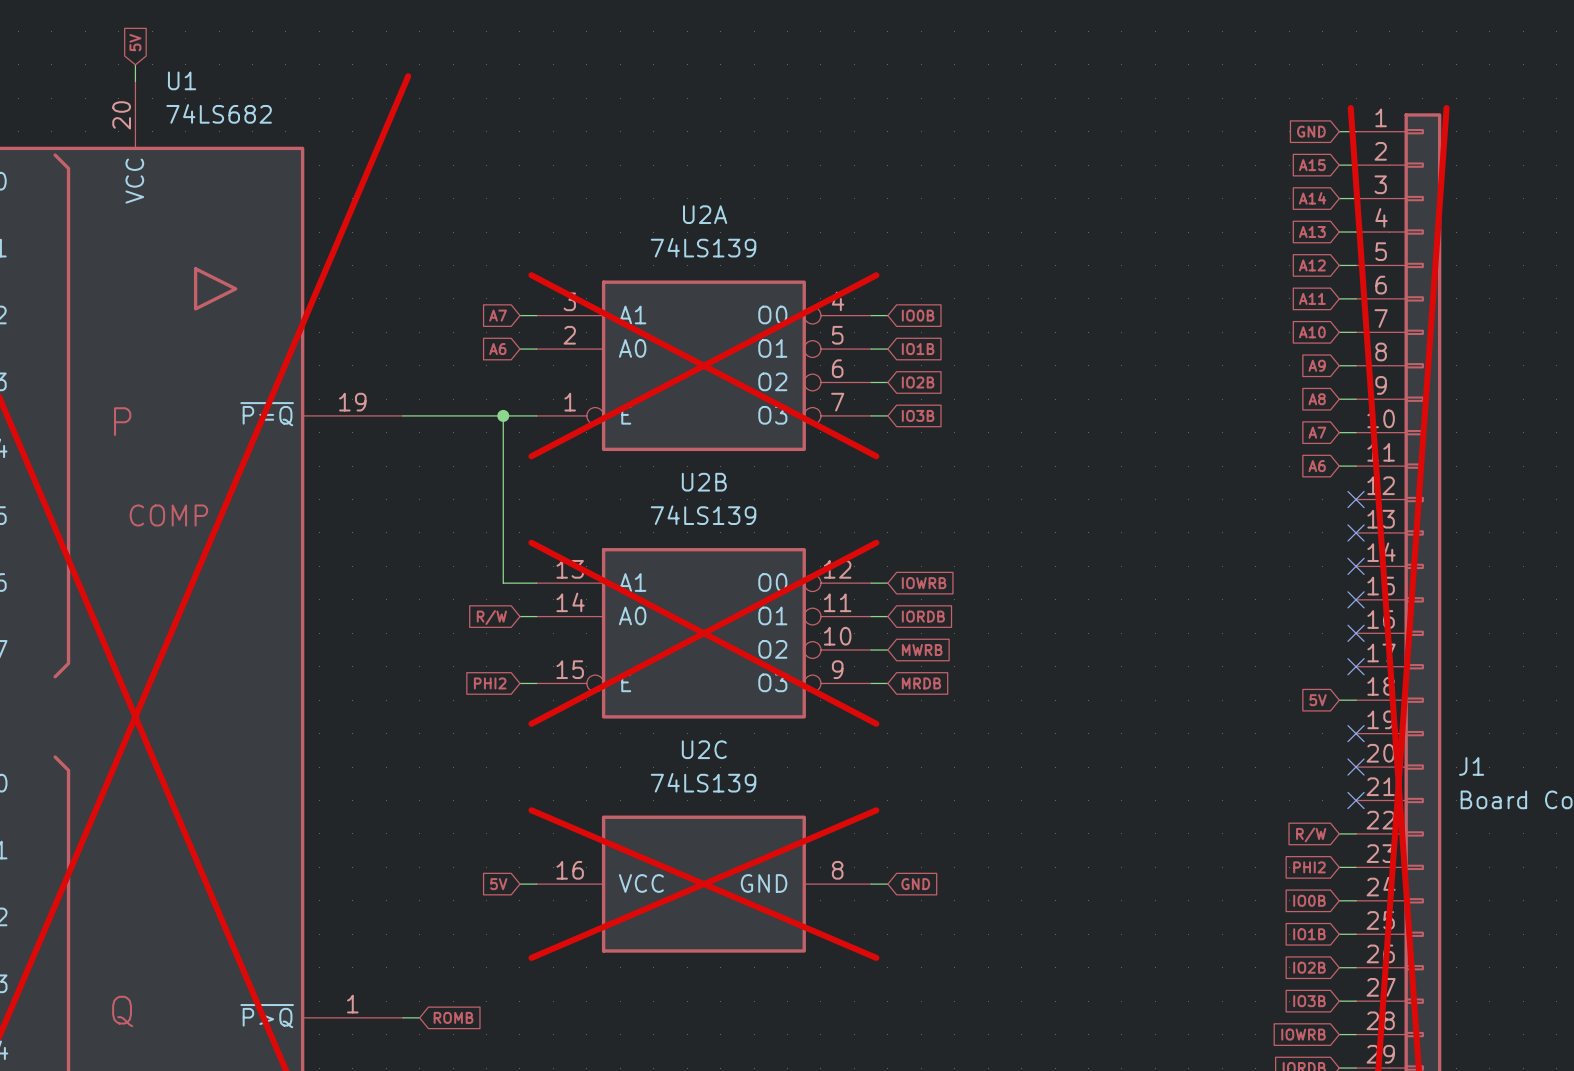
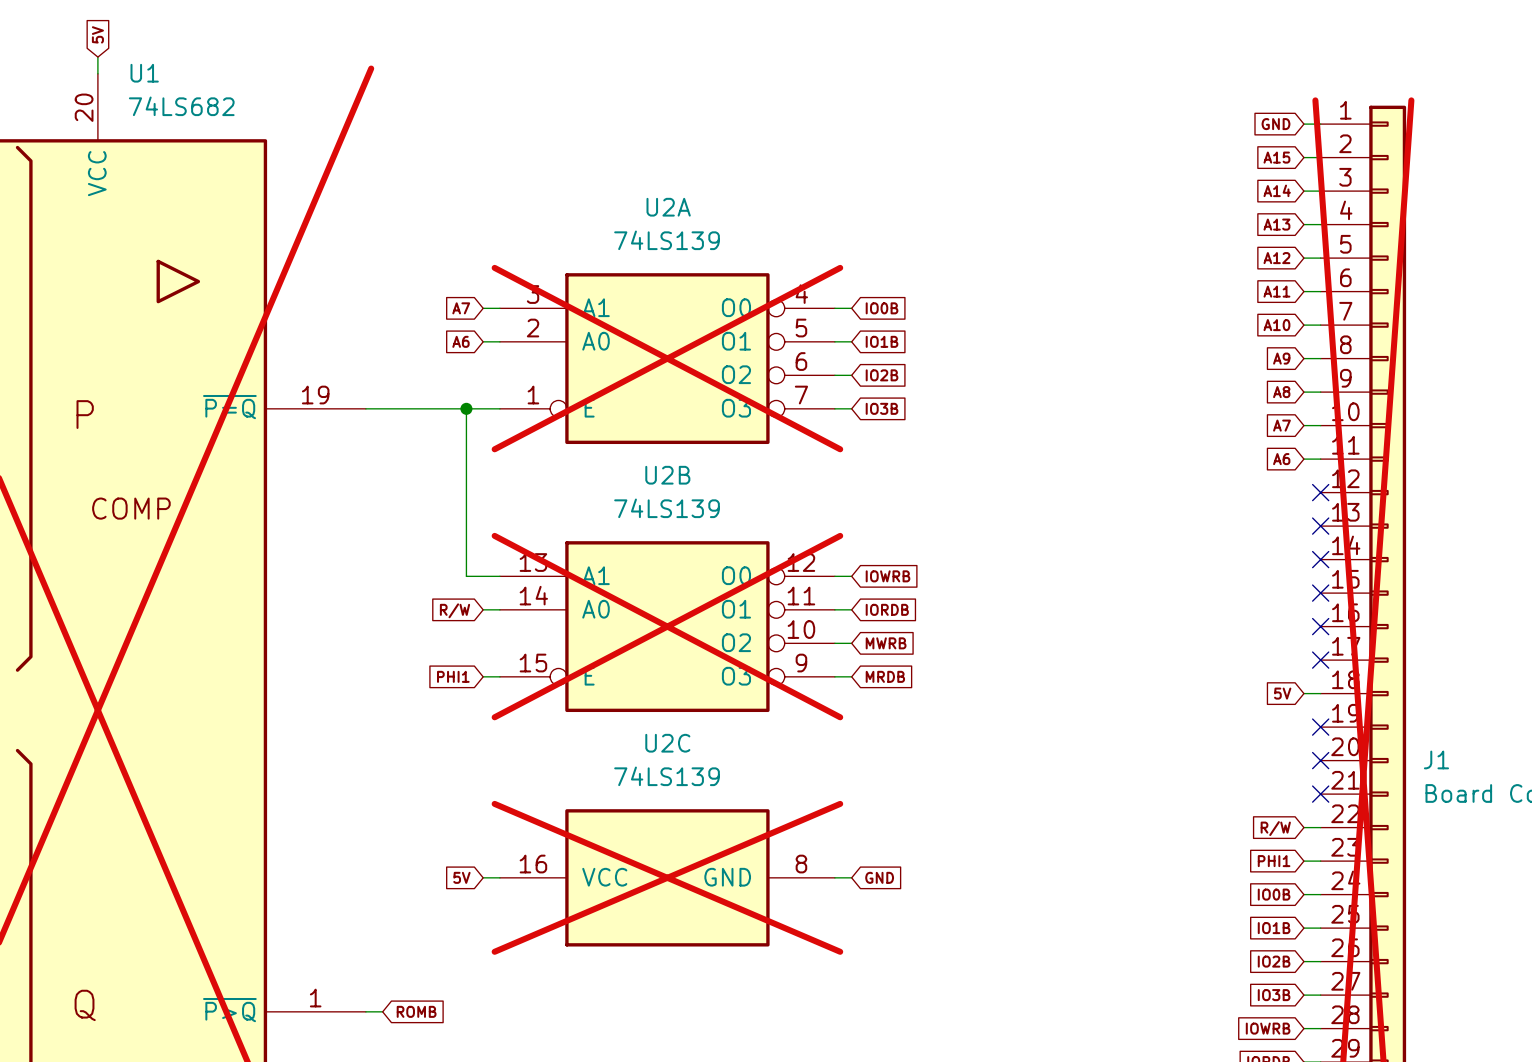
global label: PHI2 (490, 683) -> PHI1 (453, 676)
global label: PHI2 (1309, 867) -> PHI1 (1274, 861)

